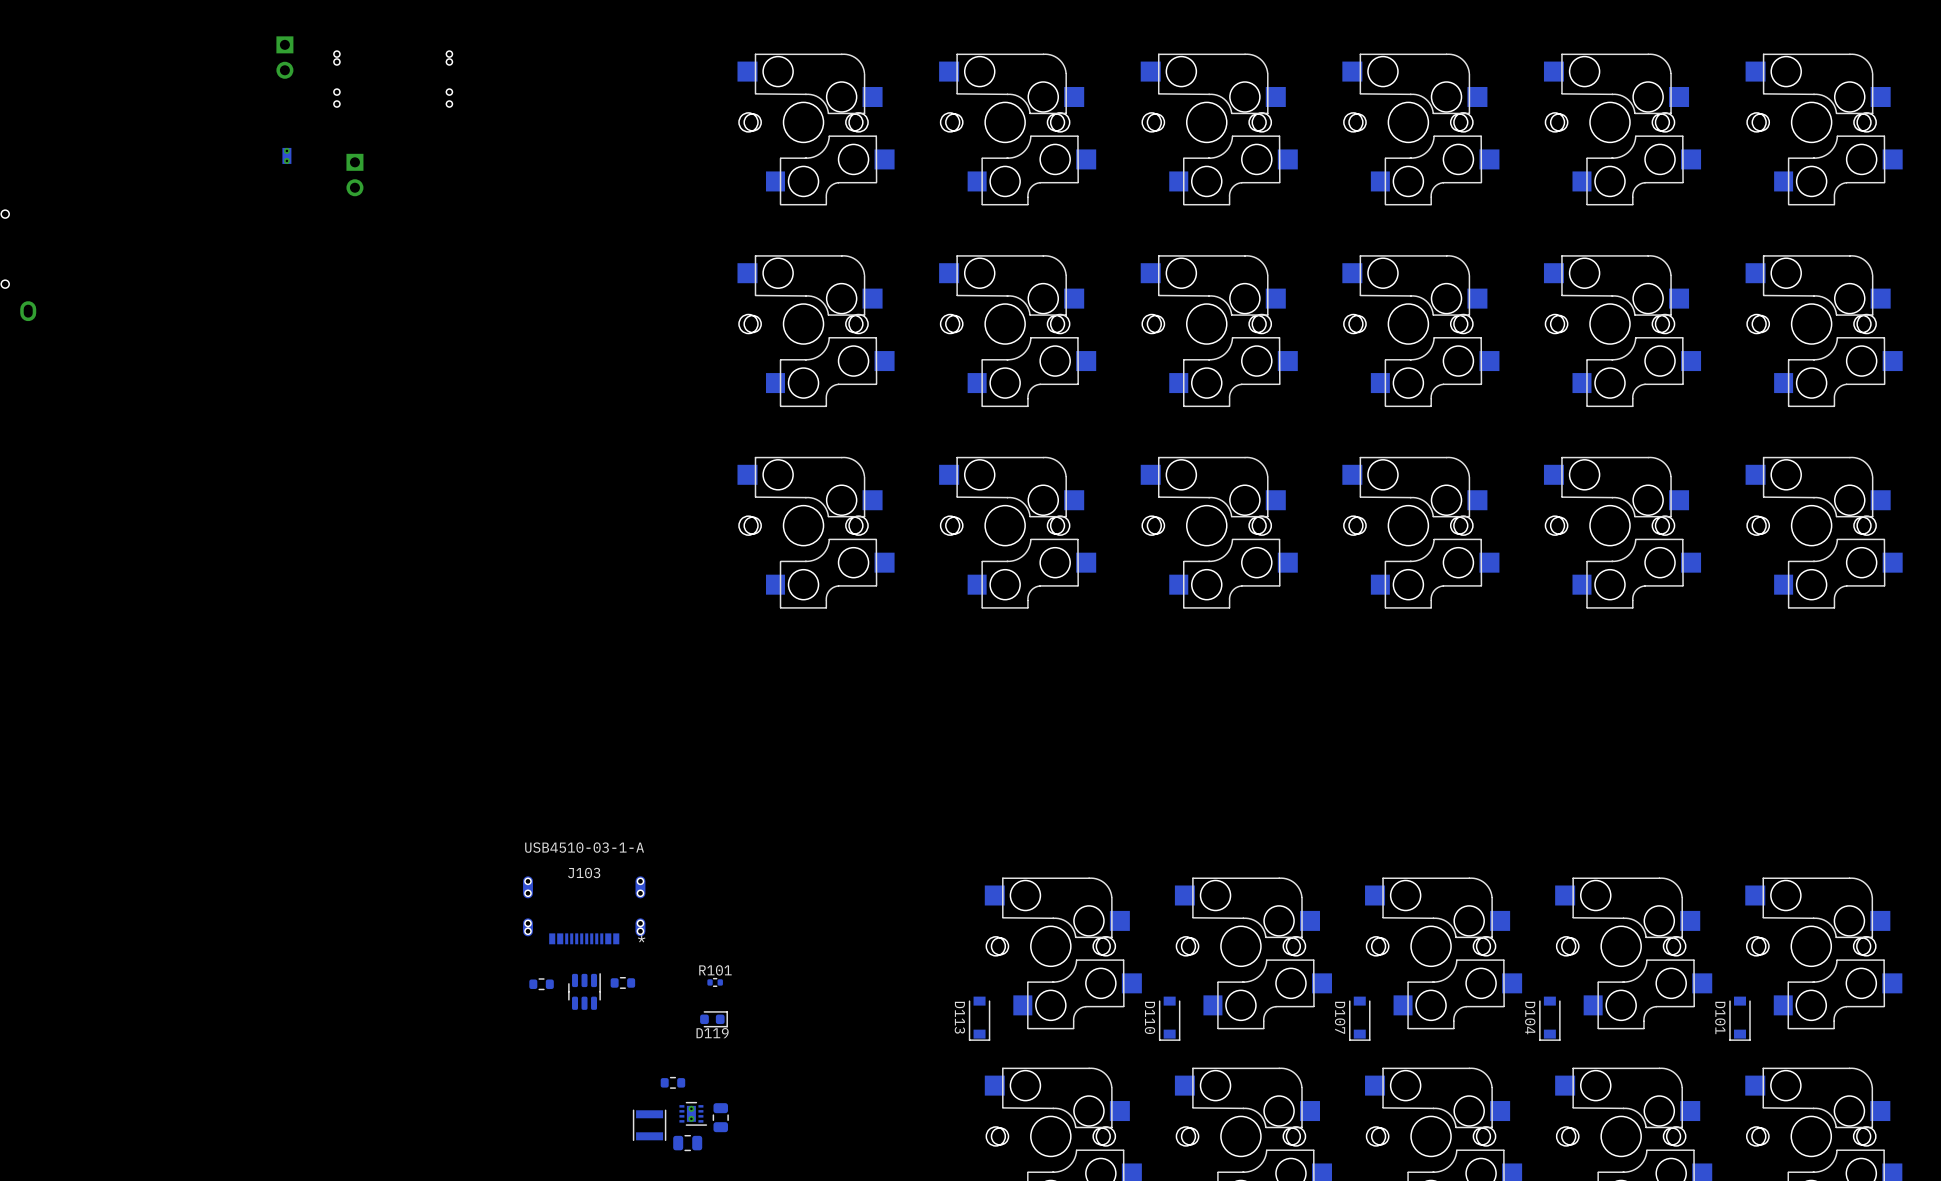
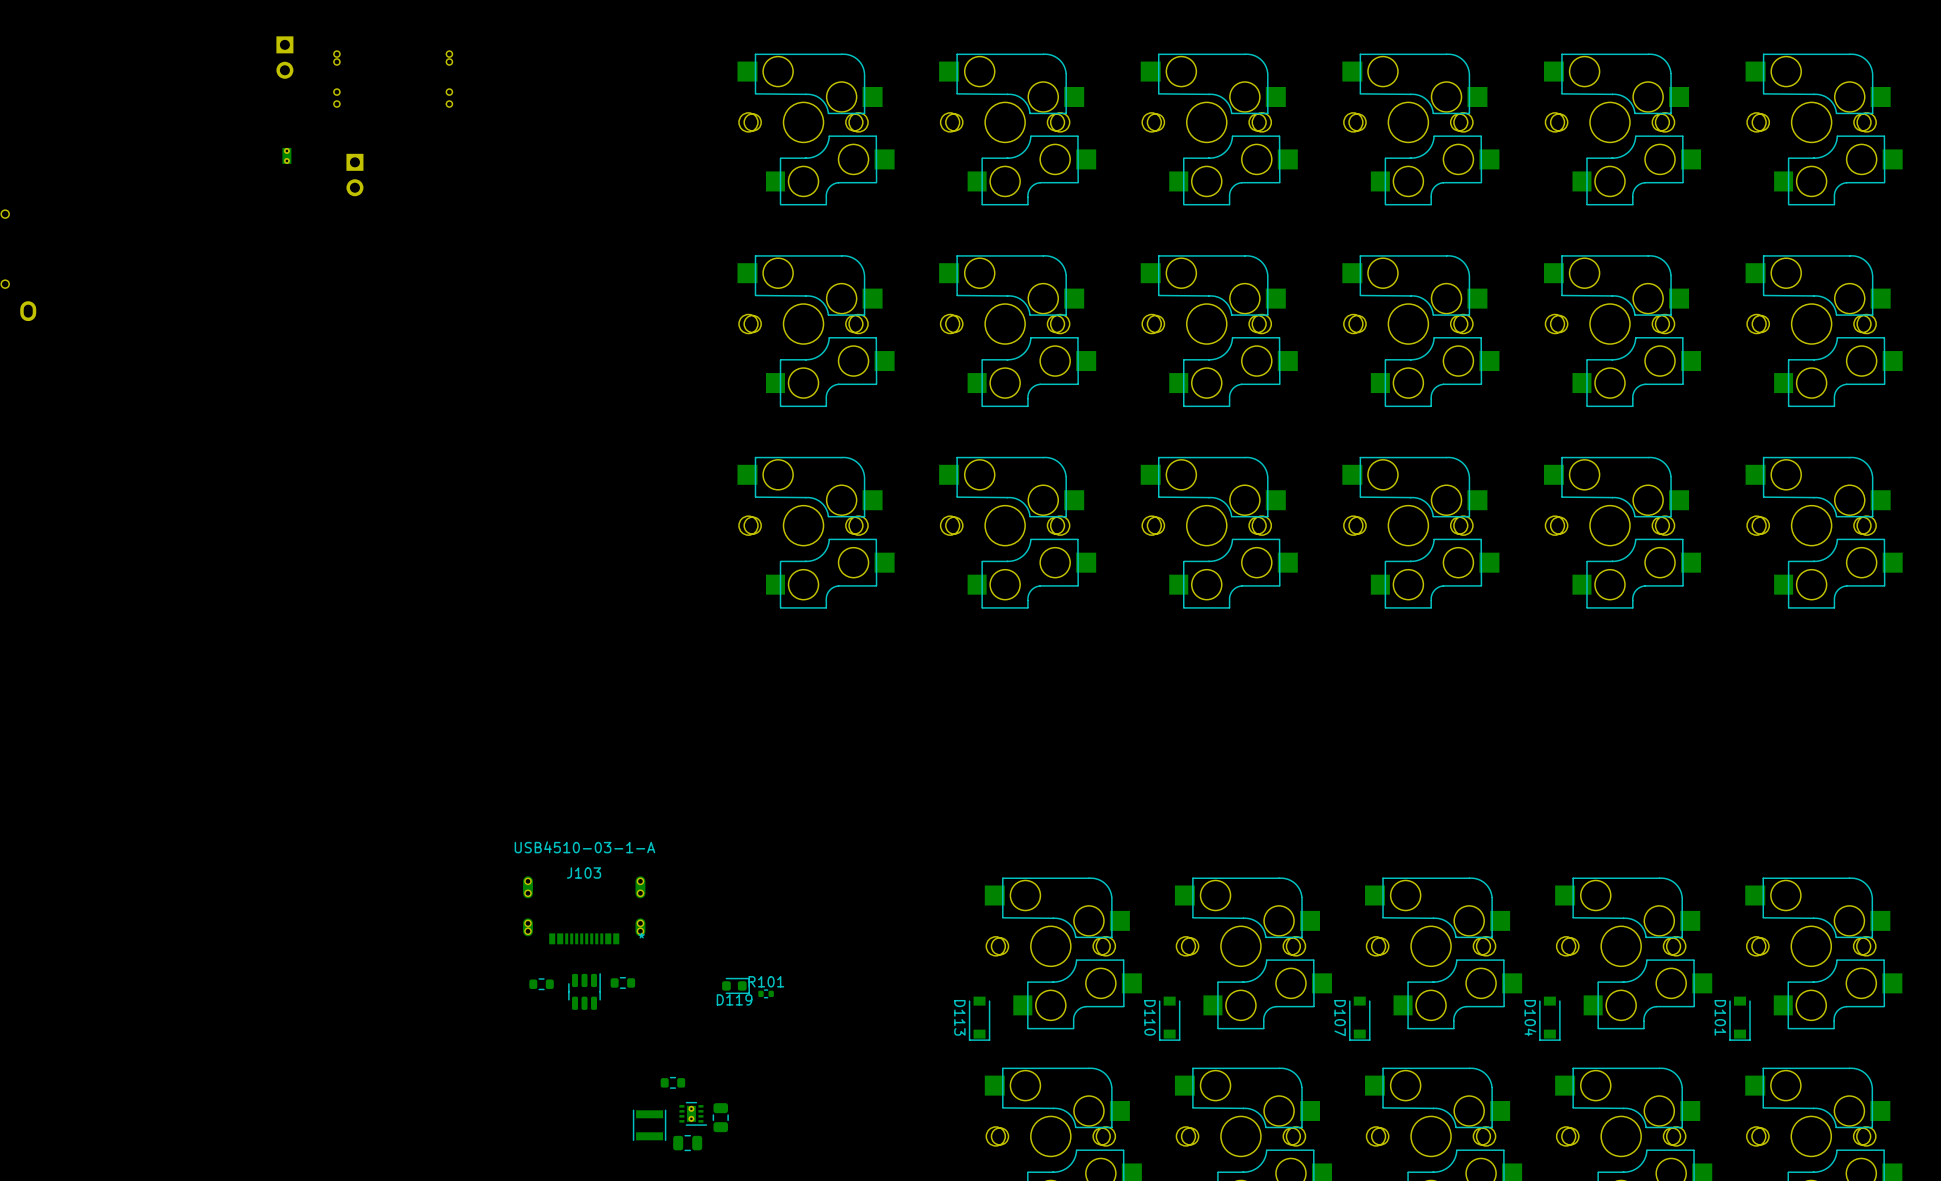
R101 position: (715, 982) -> (766, 993)
D119 position: (713, 1019) -> (735, 985)

